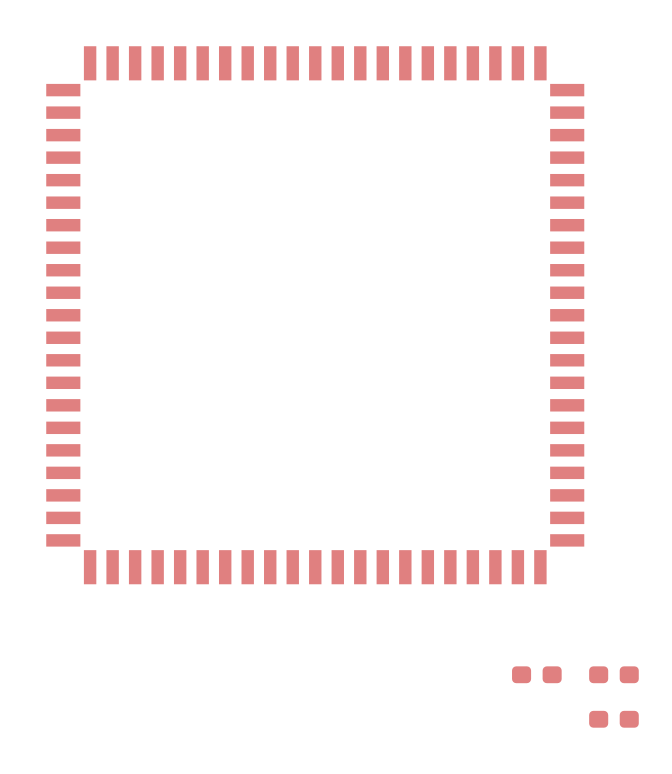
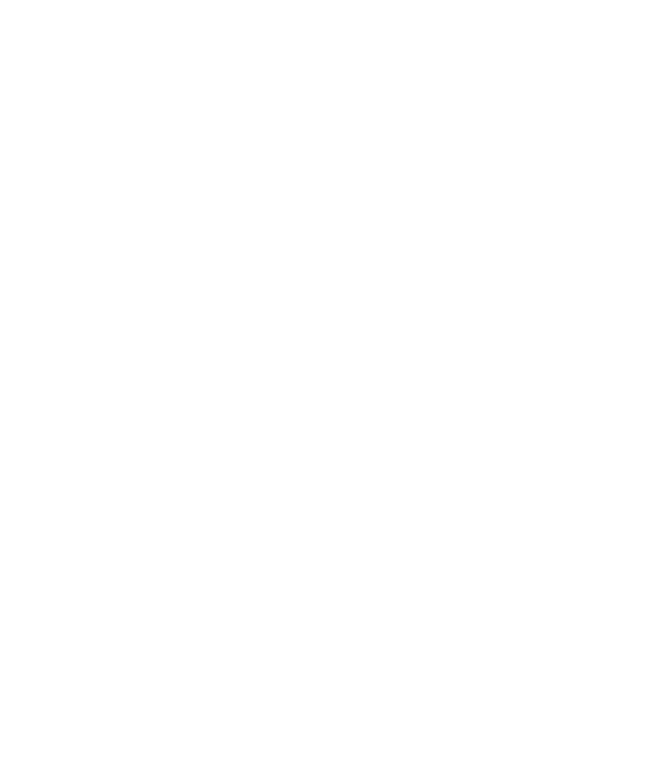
part: (315, 315) -> none
part: (536, 674) -> none
part: (613, 674) -> none
part: (613, 719) -> none

